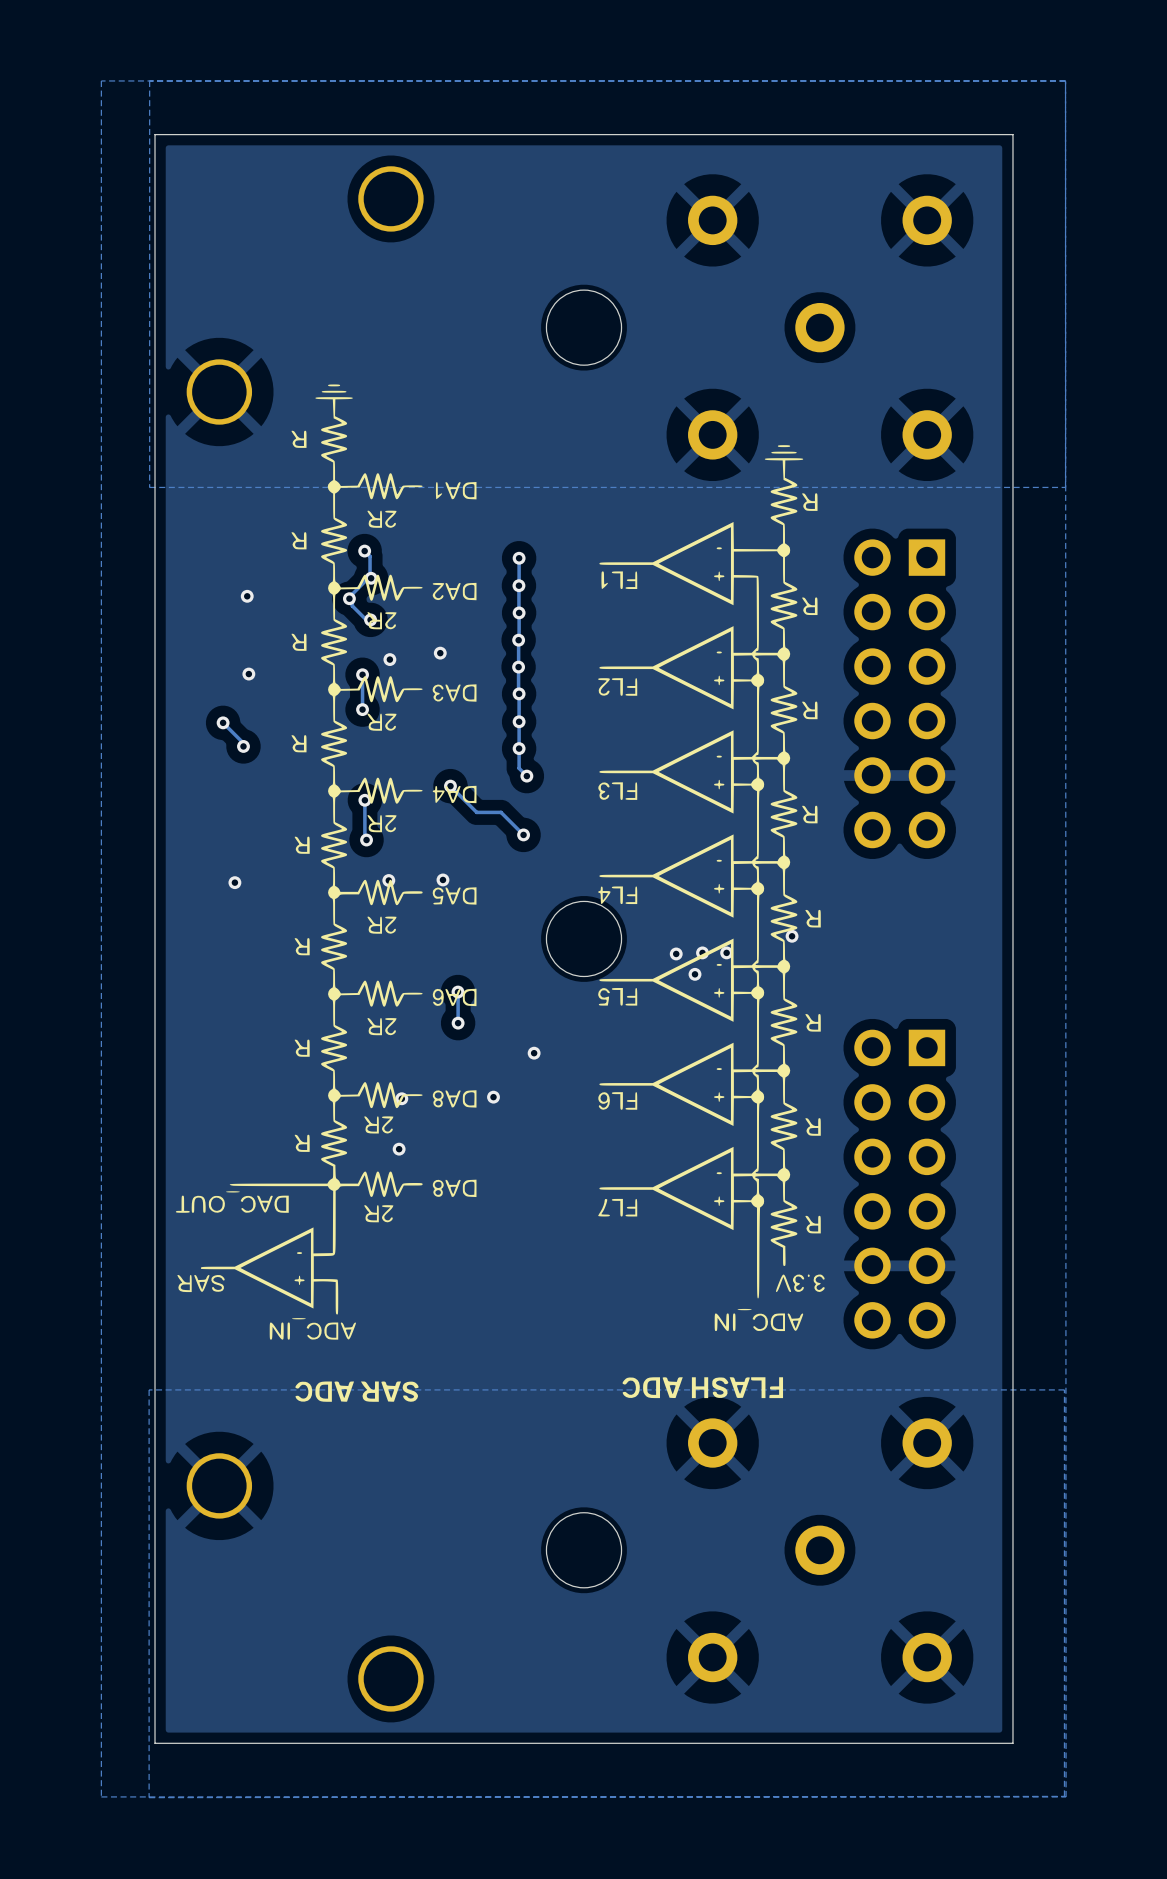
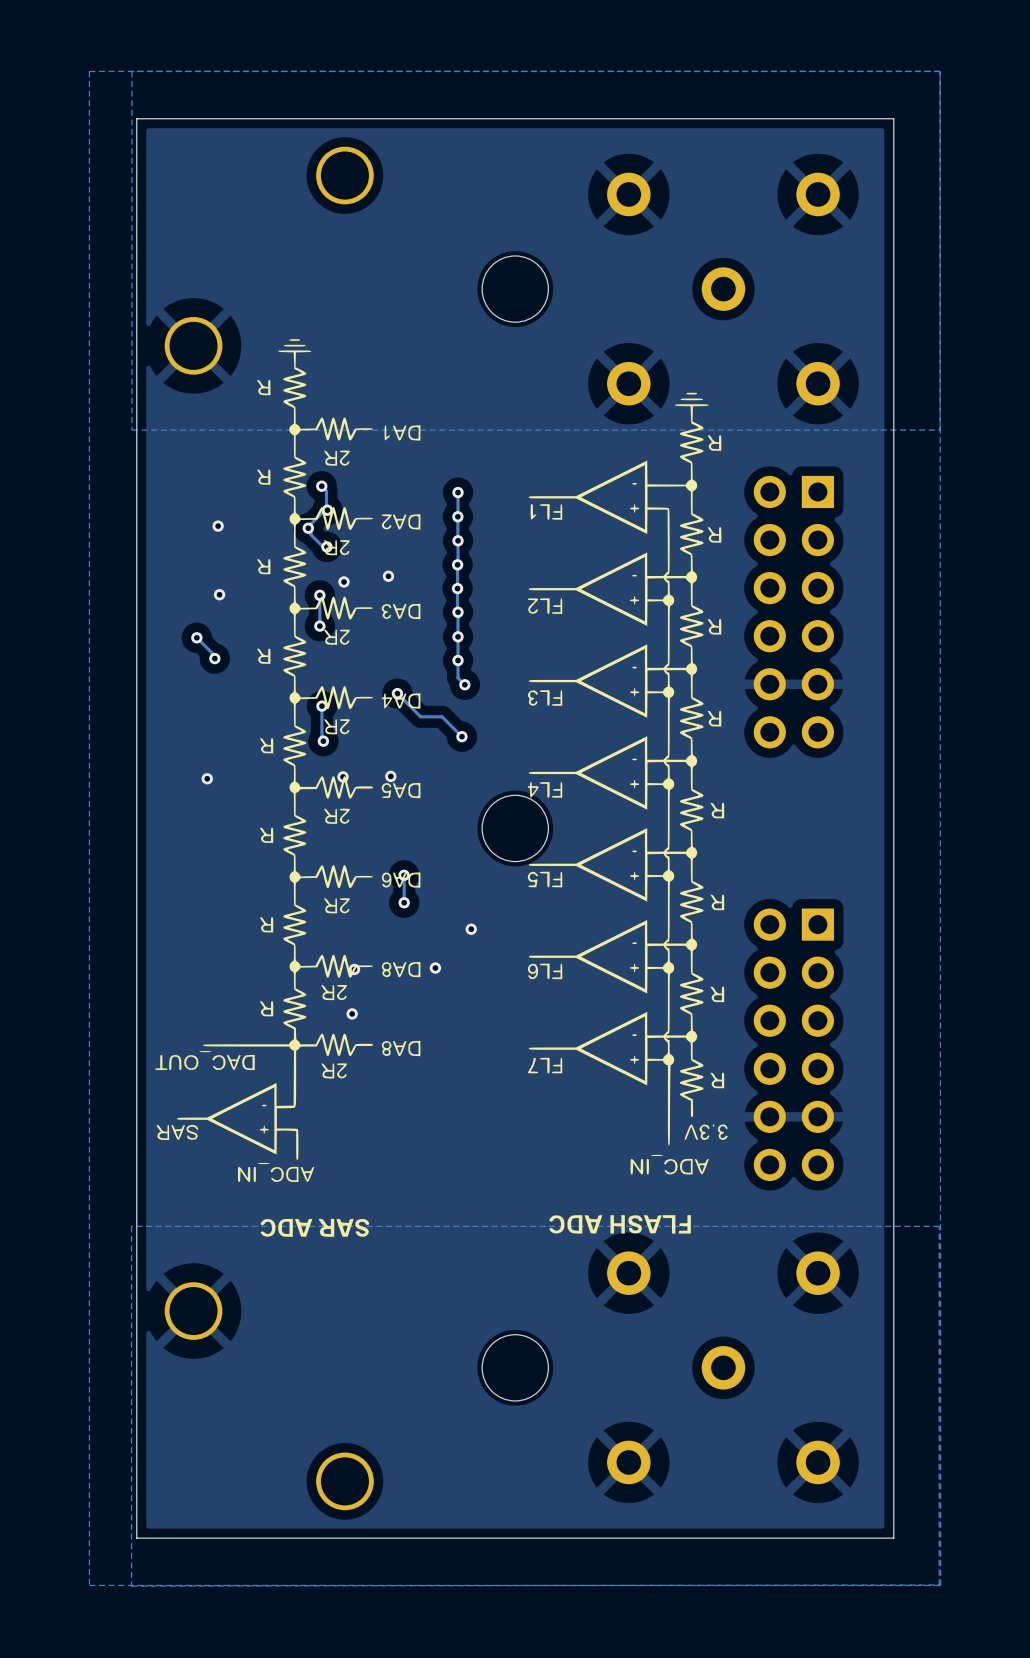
via: (792, 936) -> none
via: (702, 952) -> none
via: (726, 952) -> none
via: (676, 953) -> none
via: (695, 974) -> none

